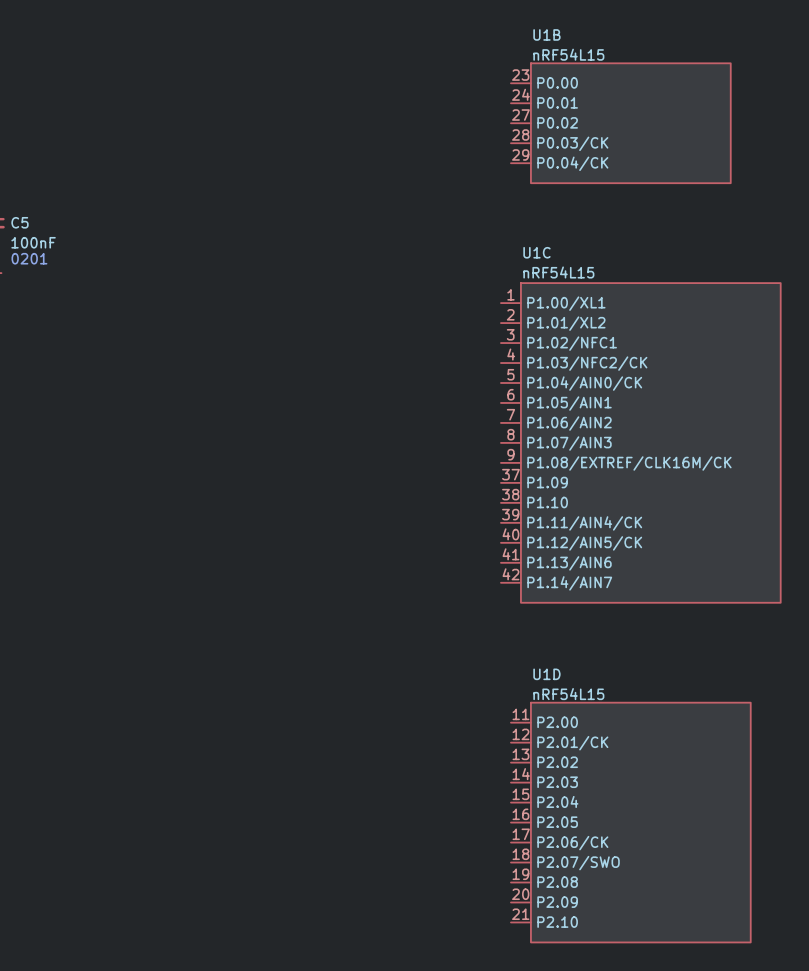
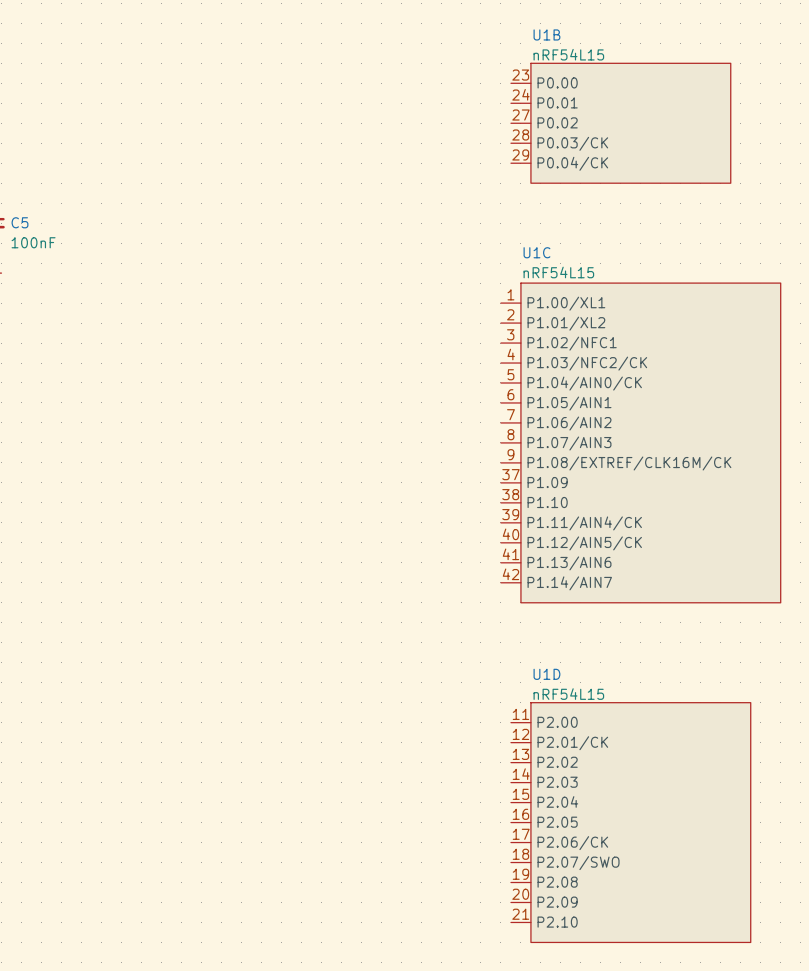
text: 0201 (29, 258) -> none

